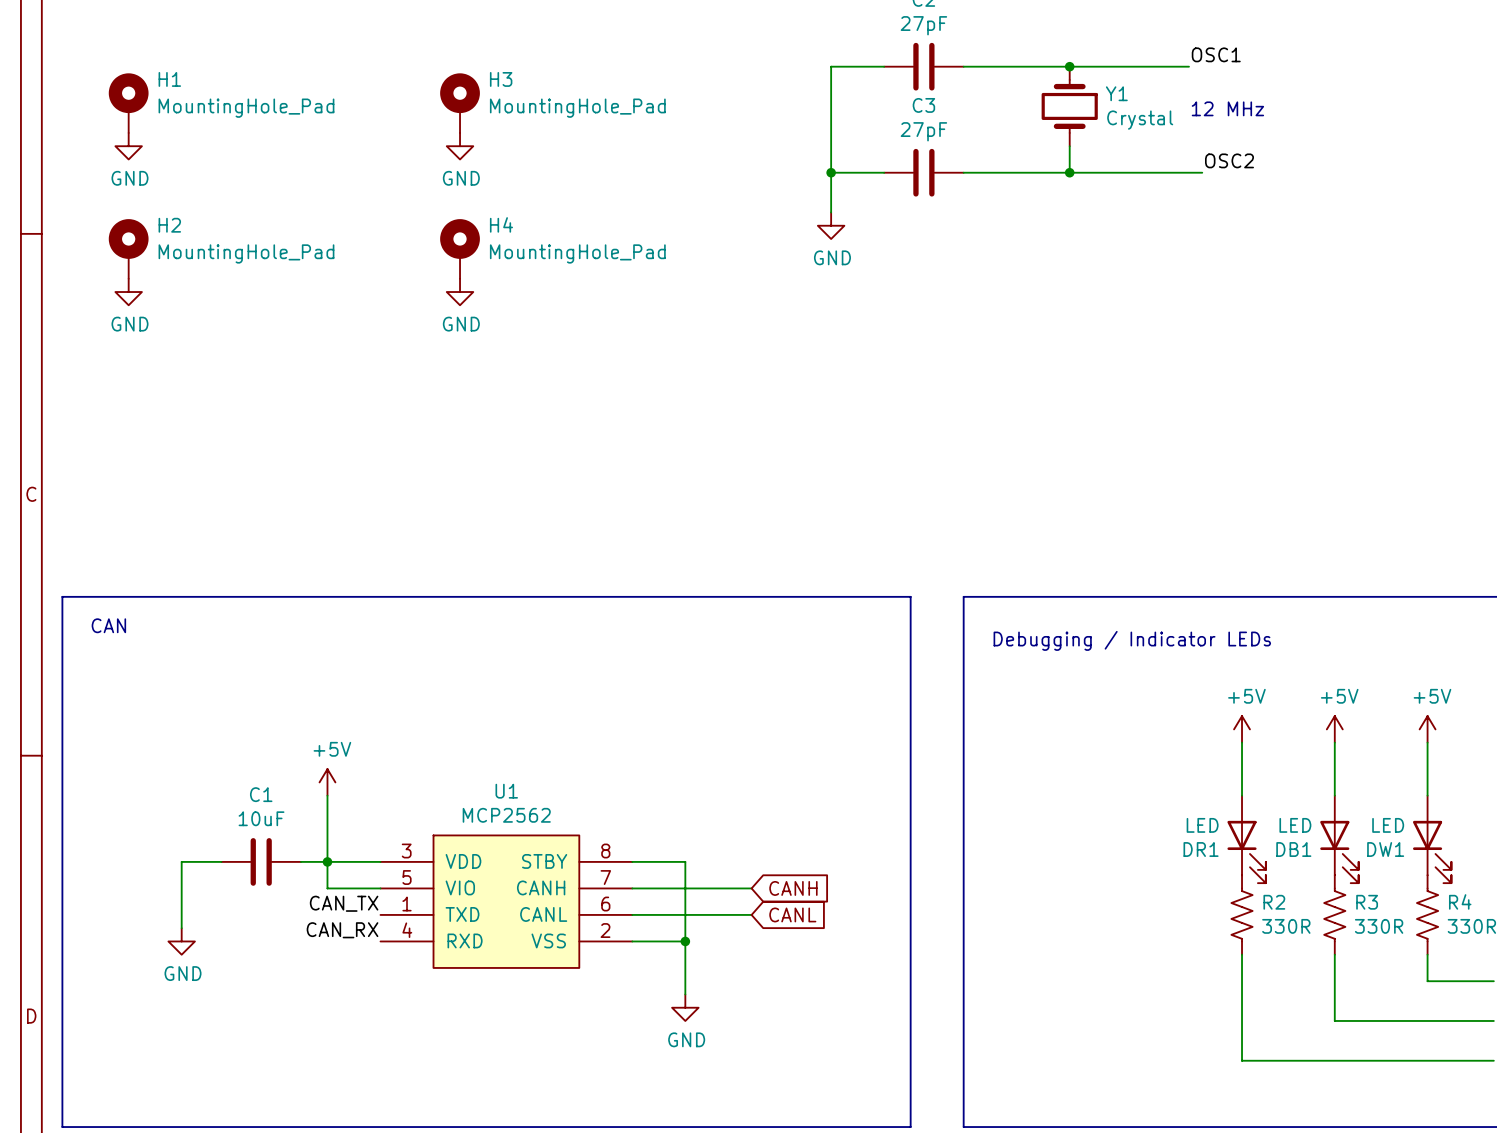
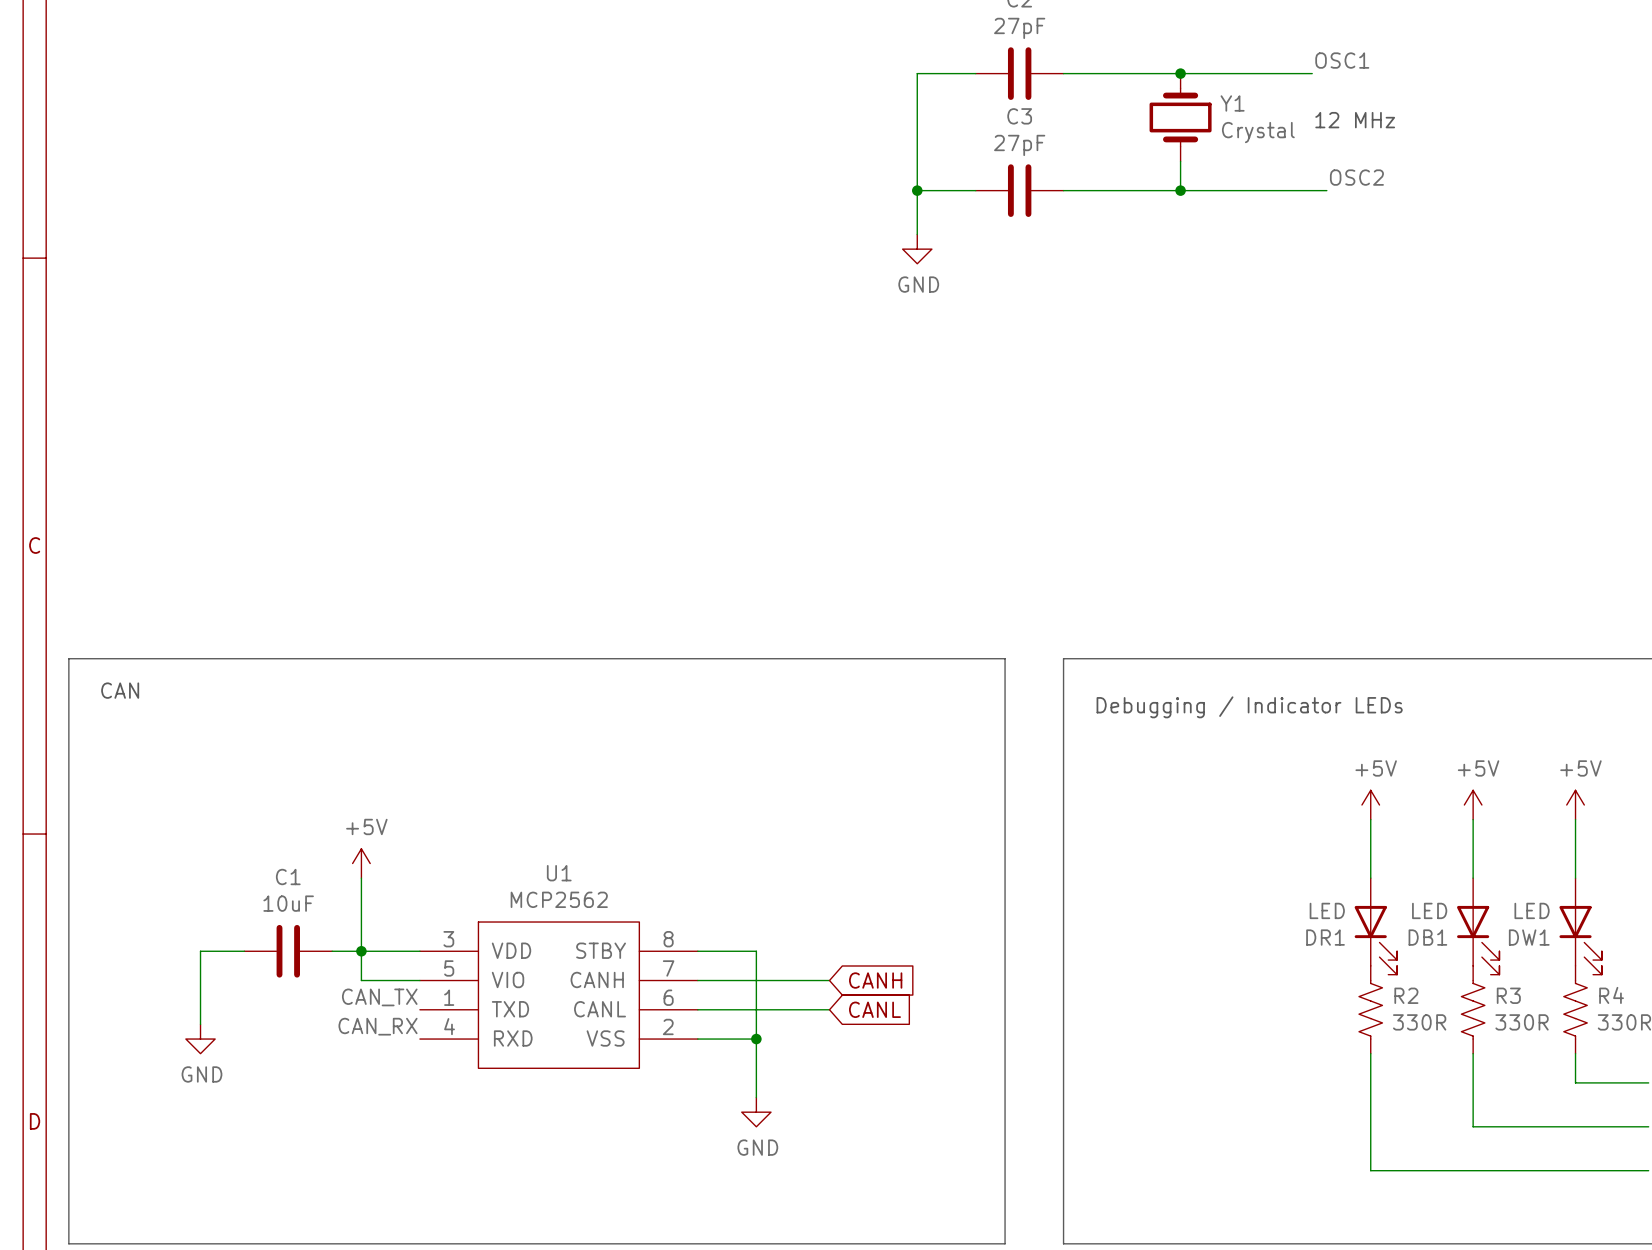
H1: MountingHole_Pad (128, 103) -> none
H3: MountingHole_Pad (460, 103) -> none
power symbol: GND (128, 146) -> none
power symbol: GND (460, 146) -> none
H2: MountingHole_Pad (128, 248) -> none
H4: MountingHole_Pad (460, 248) -> none
power symbol: GND (128, 292) -> none
power symbol: GND (460, 292) -> none

